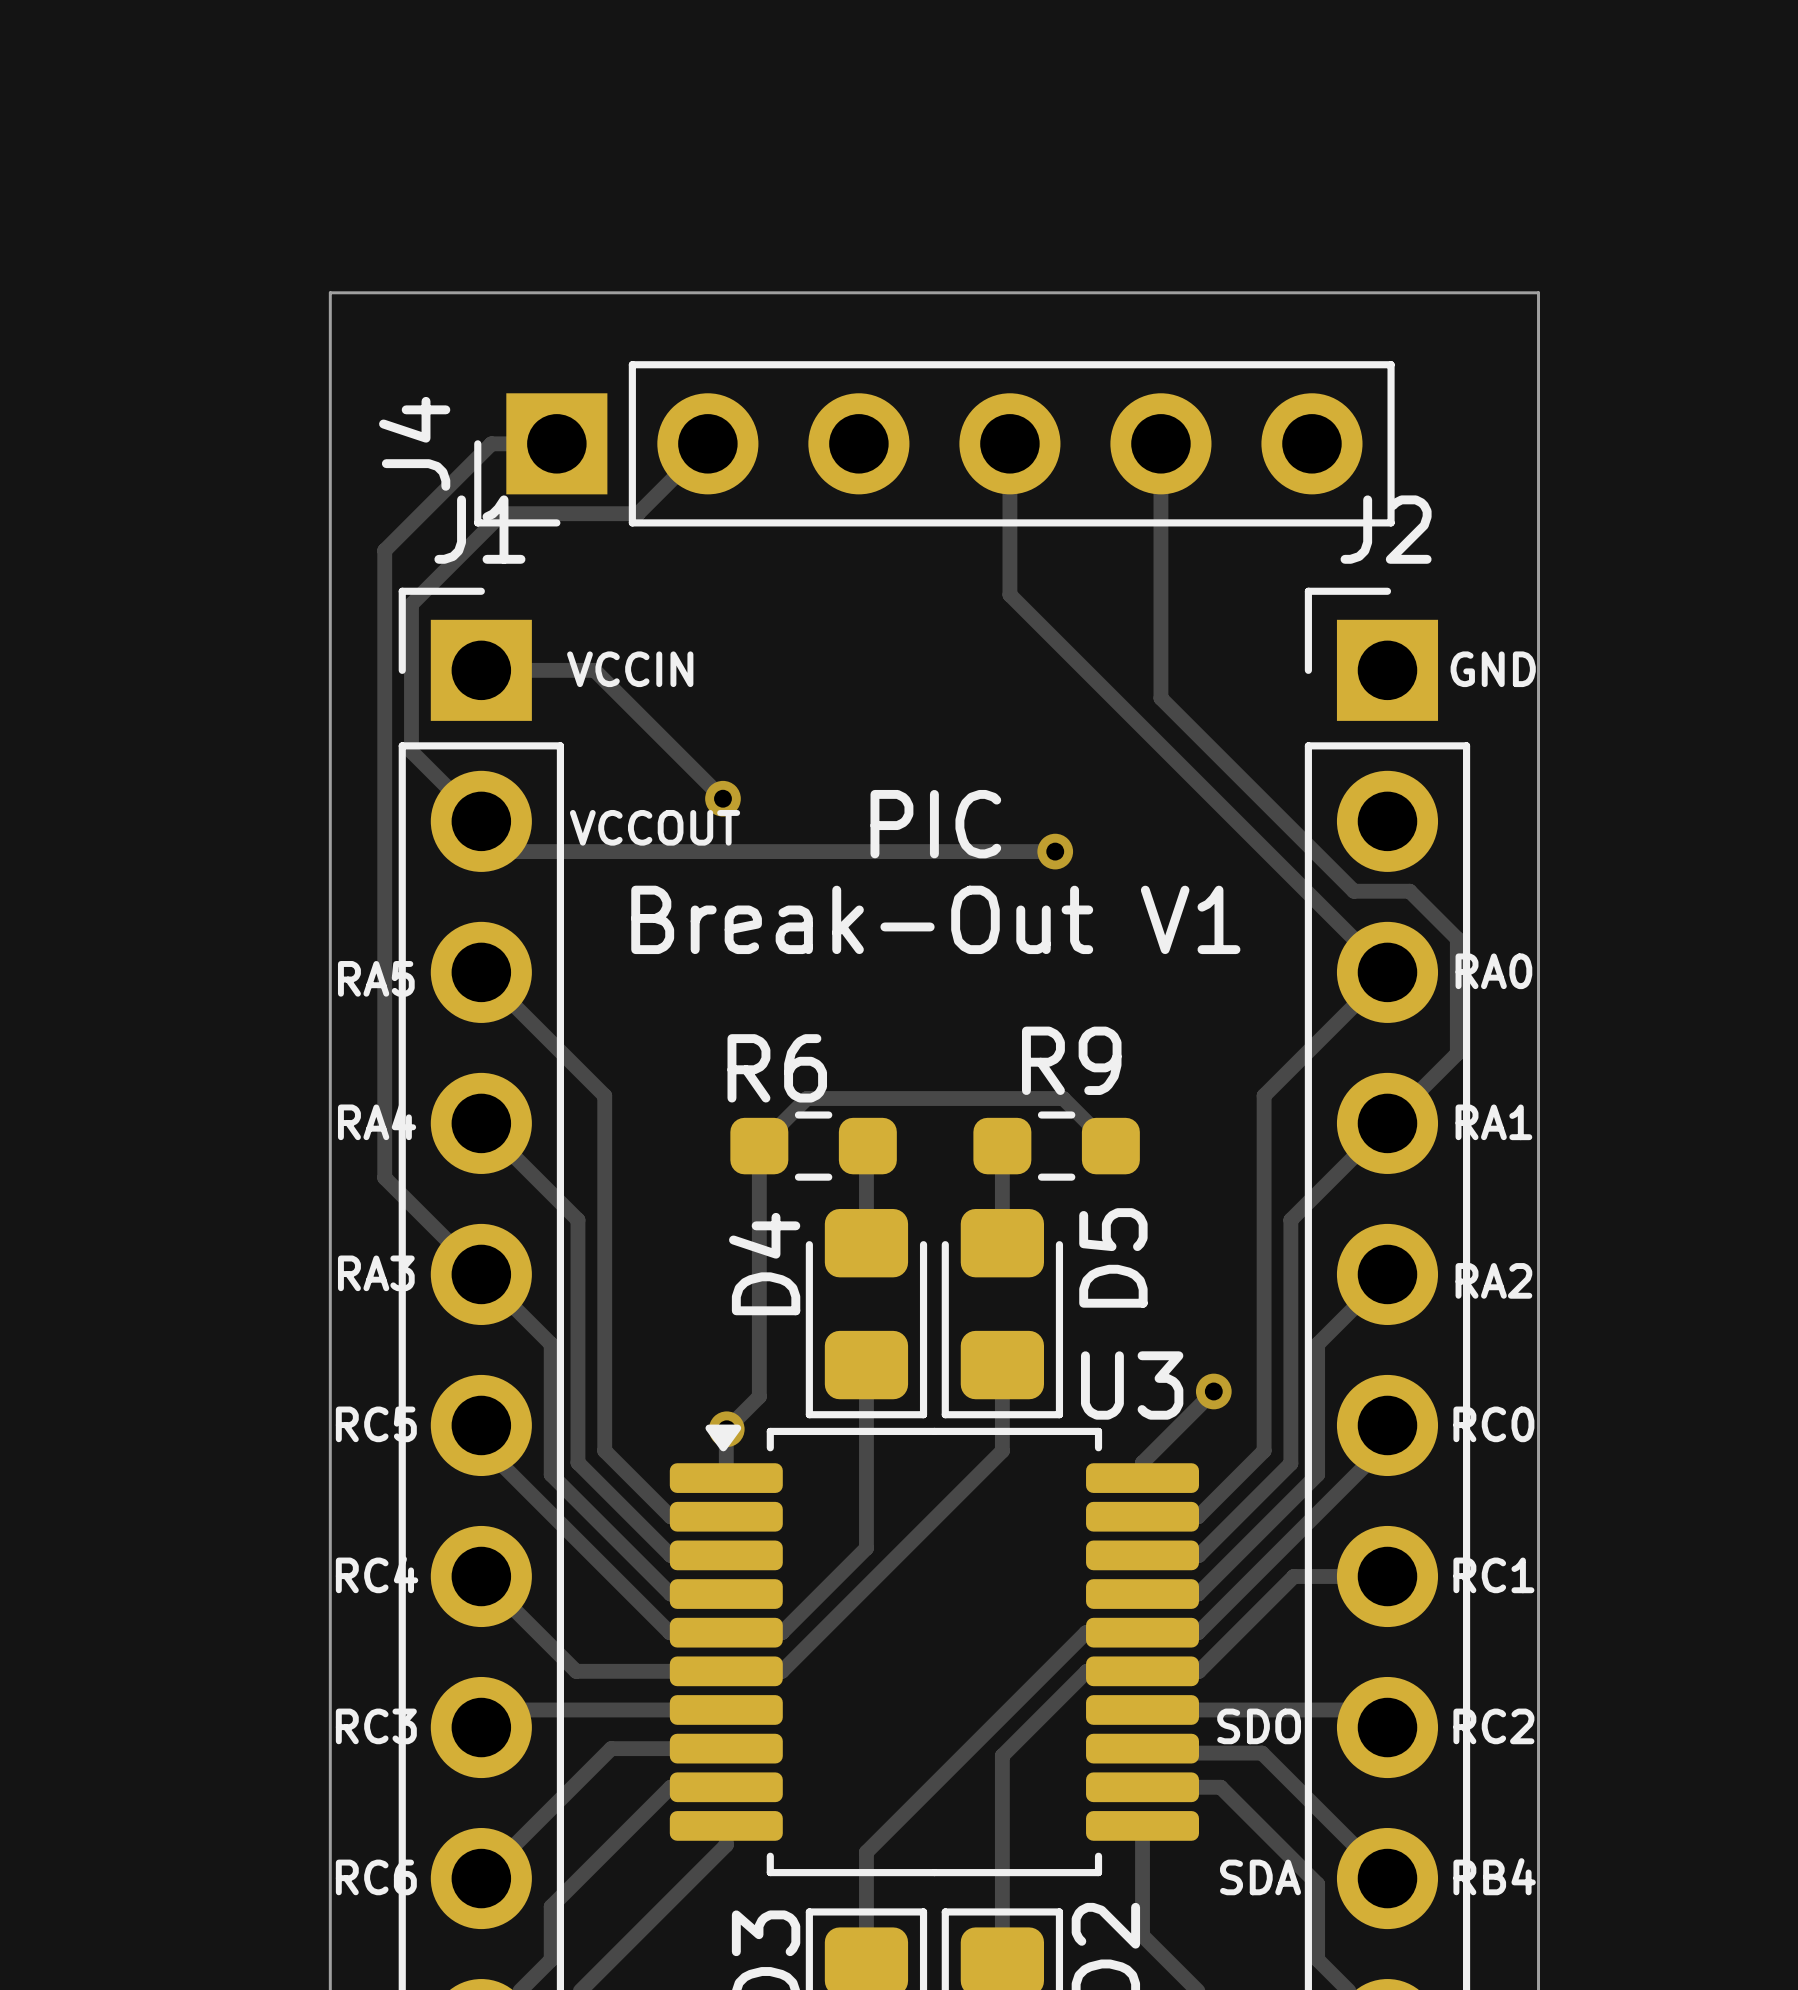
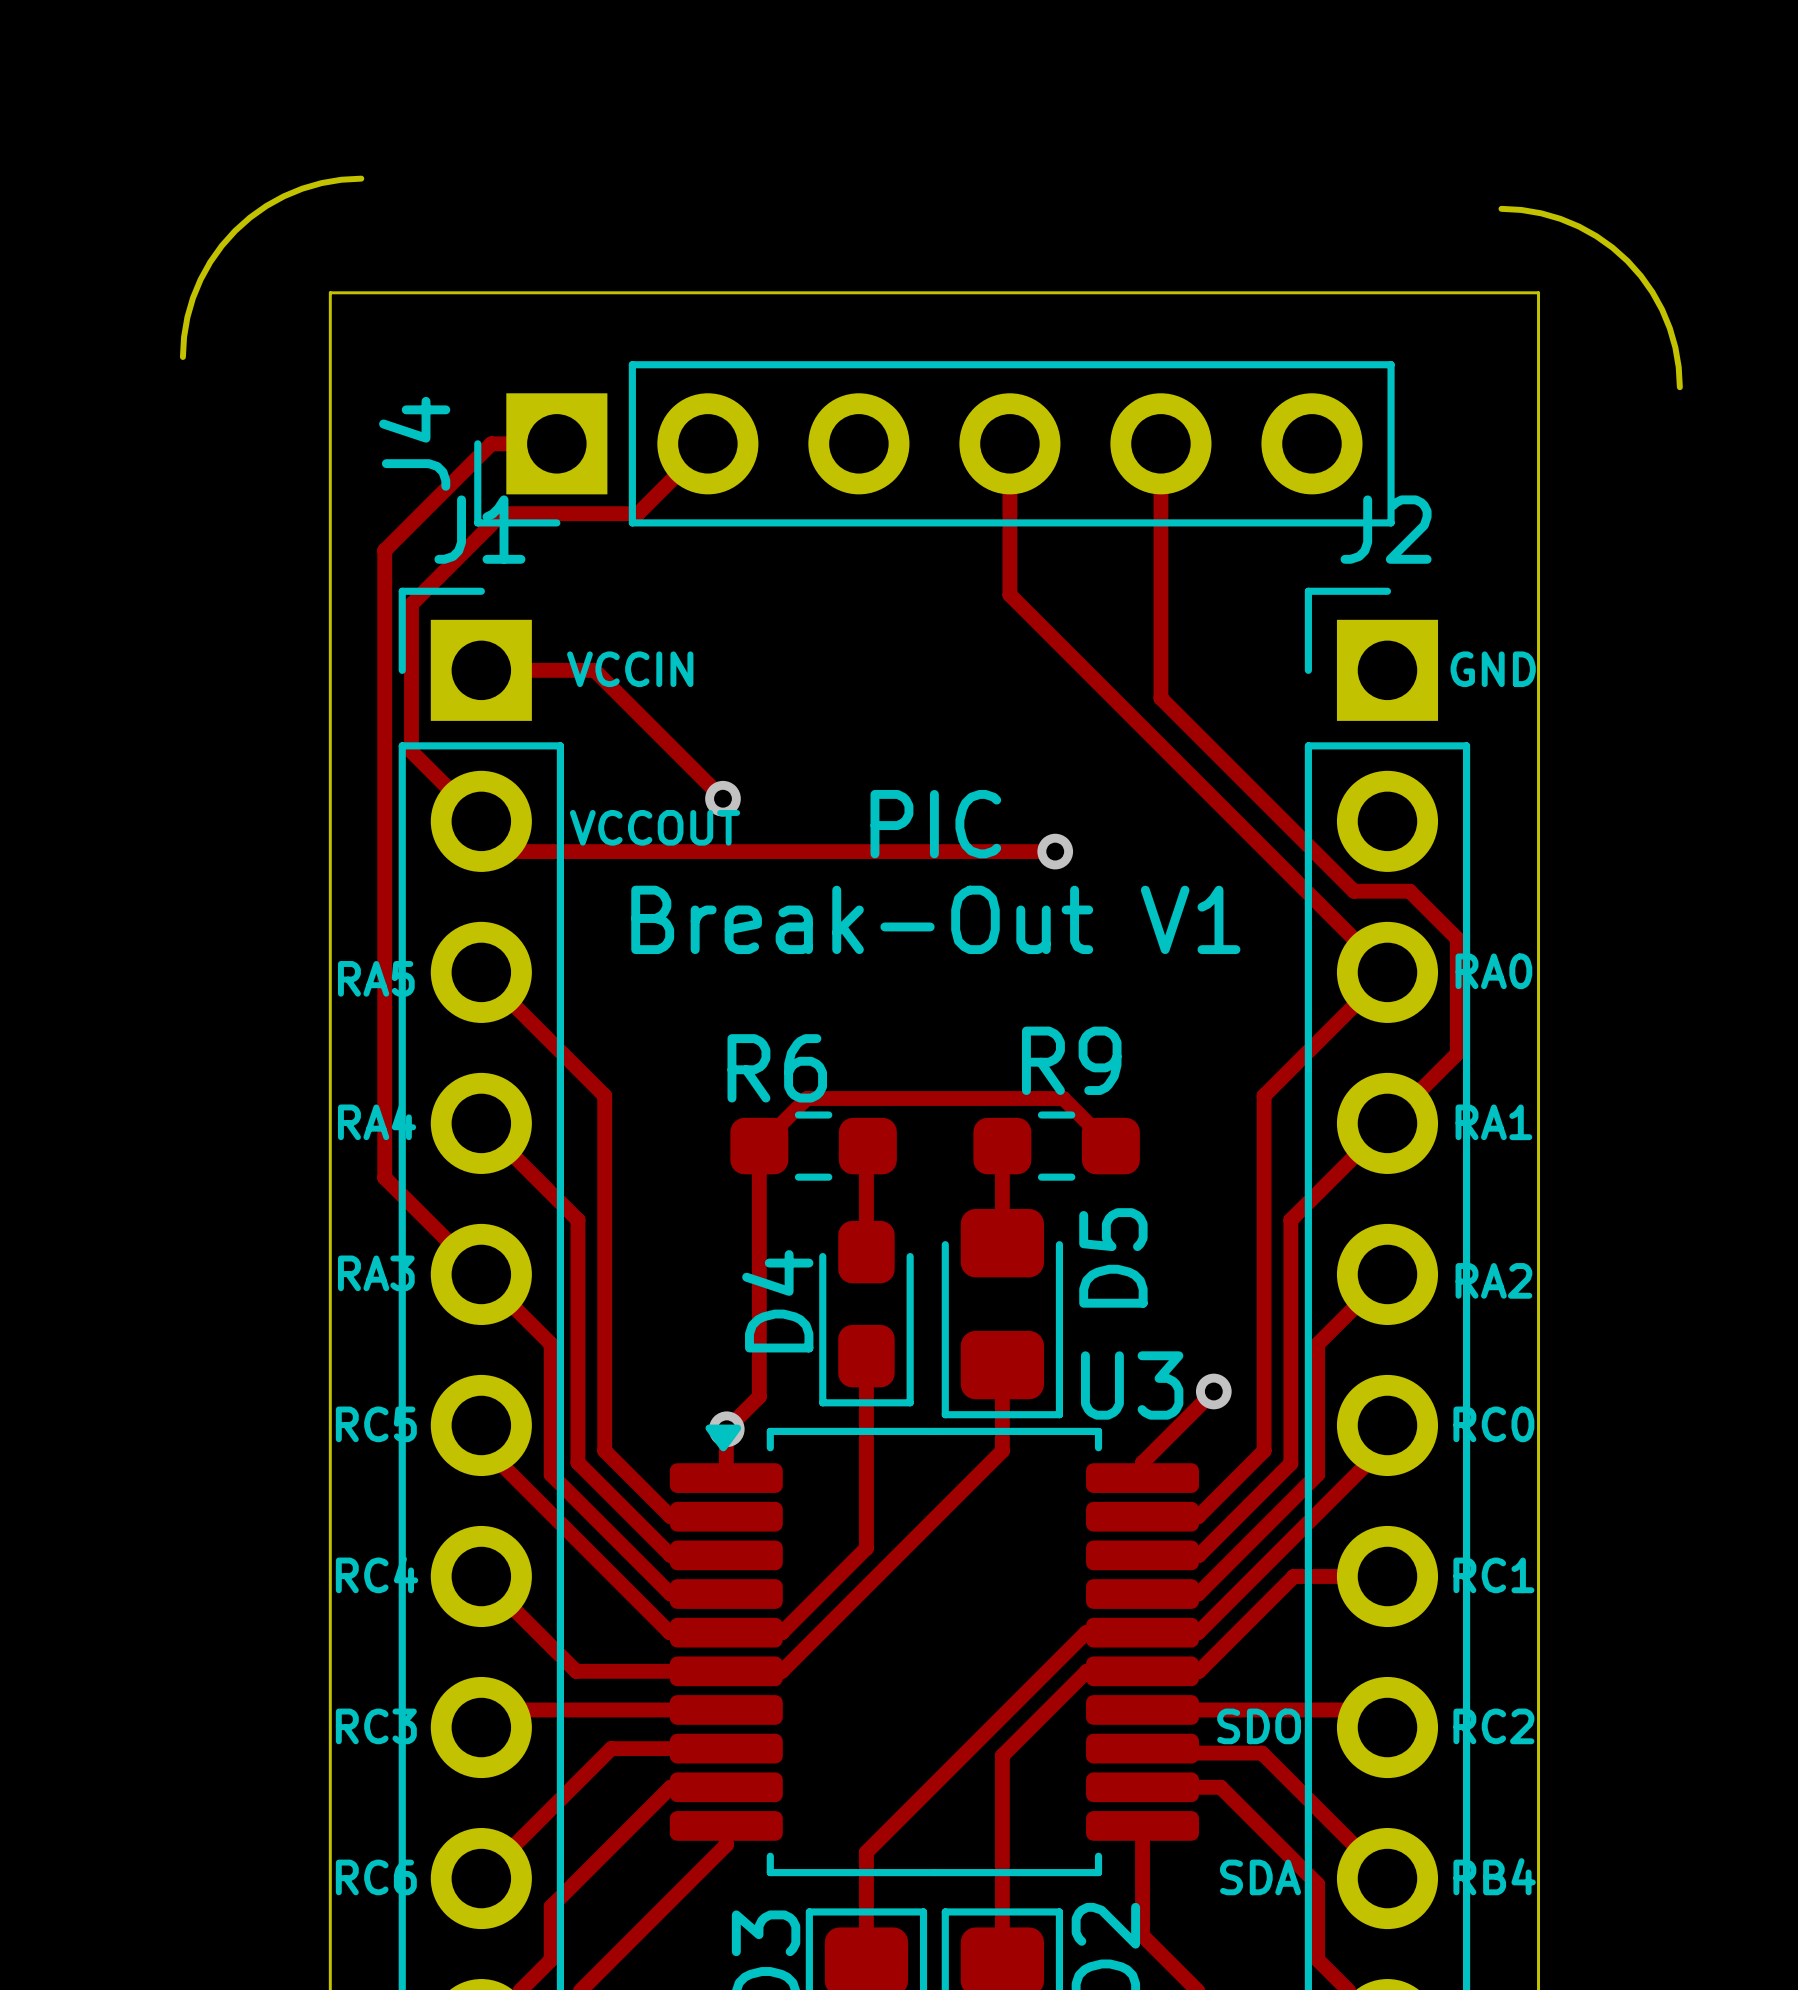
board edge: none -> (361, 178) (321, 183) (283, 196) (266, 205) (235, 230) (221, 245) (200, 279) (187, 317) (182, 357)
board edge: none -> (1501, 208) (1541, 213) (1560, 218) (1596, 236) (1627, 261) (1640, 275) (1662, 309) (1675, 347) (1679, 387)
D4 footprint: [805, 1208, 928, 1419] -> [819, 1220, 914, 1407]
D4 name position: D4 (764, 1264) -> D4 (777, 1301)

